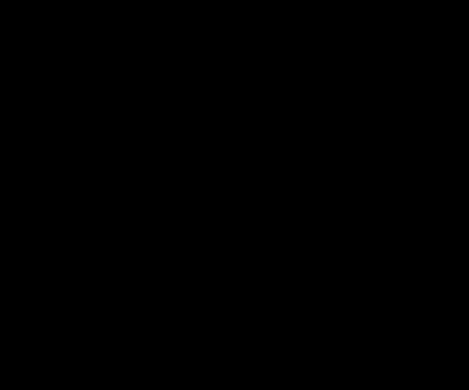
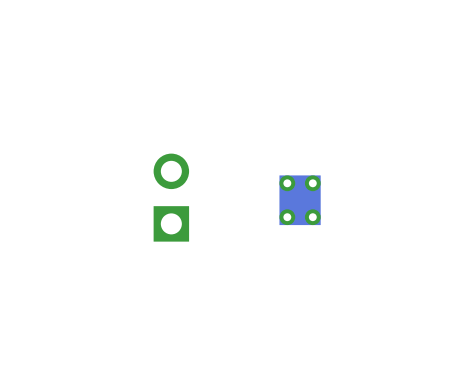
part: none -> (171, 197)
part: none -> (300, 200)

